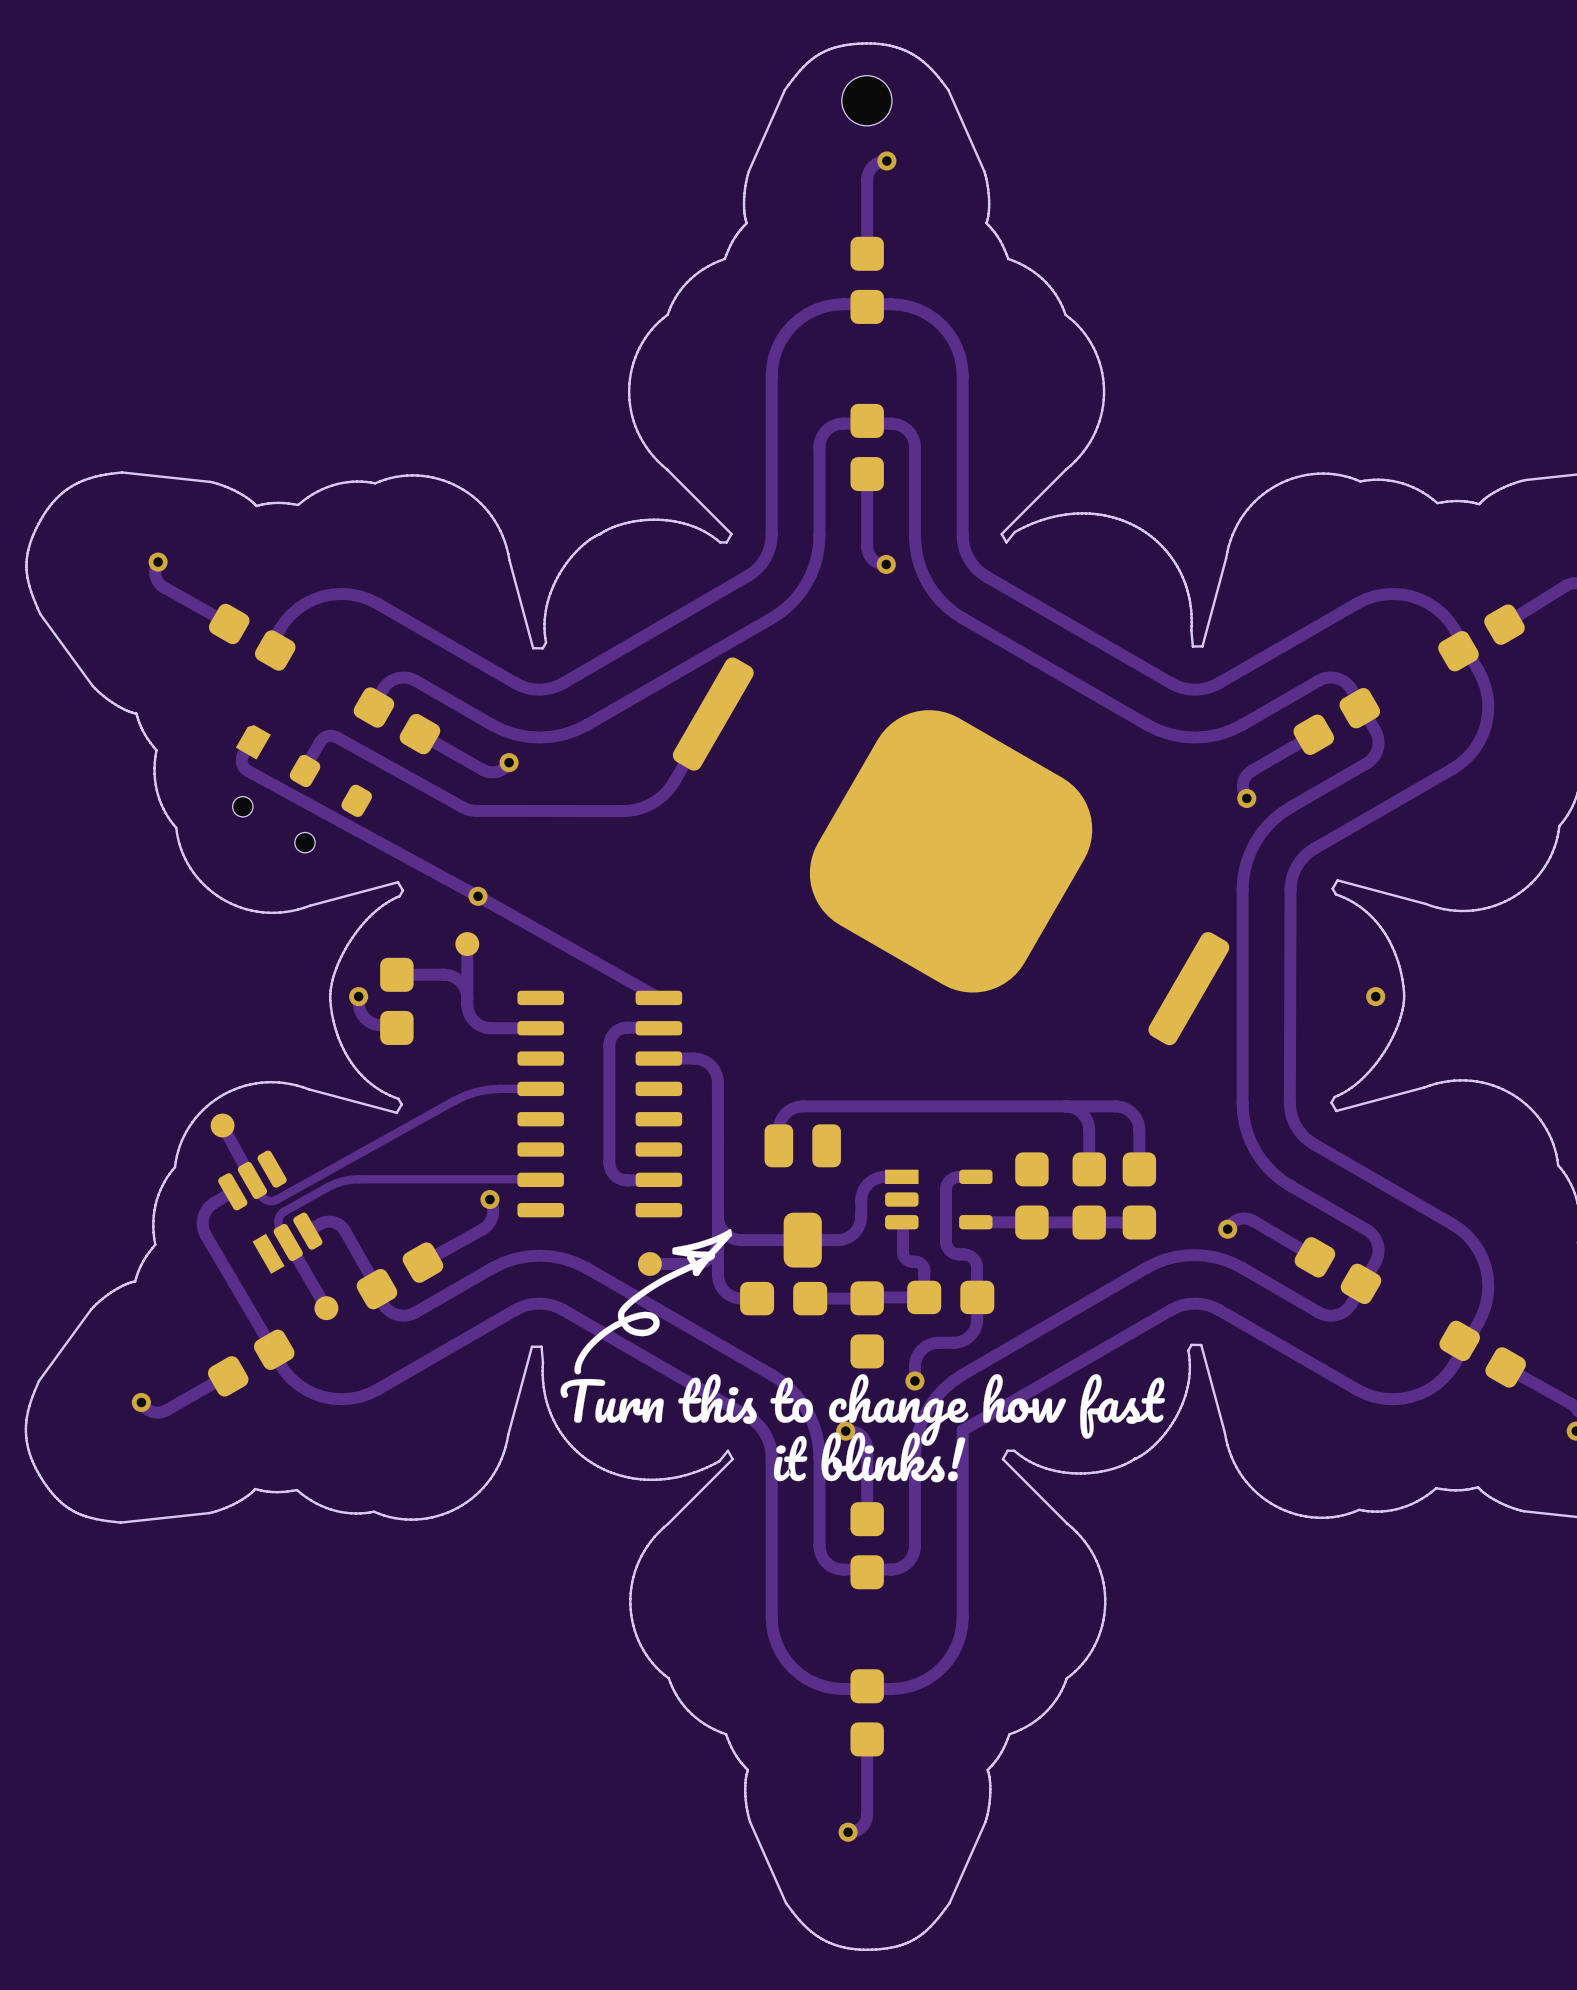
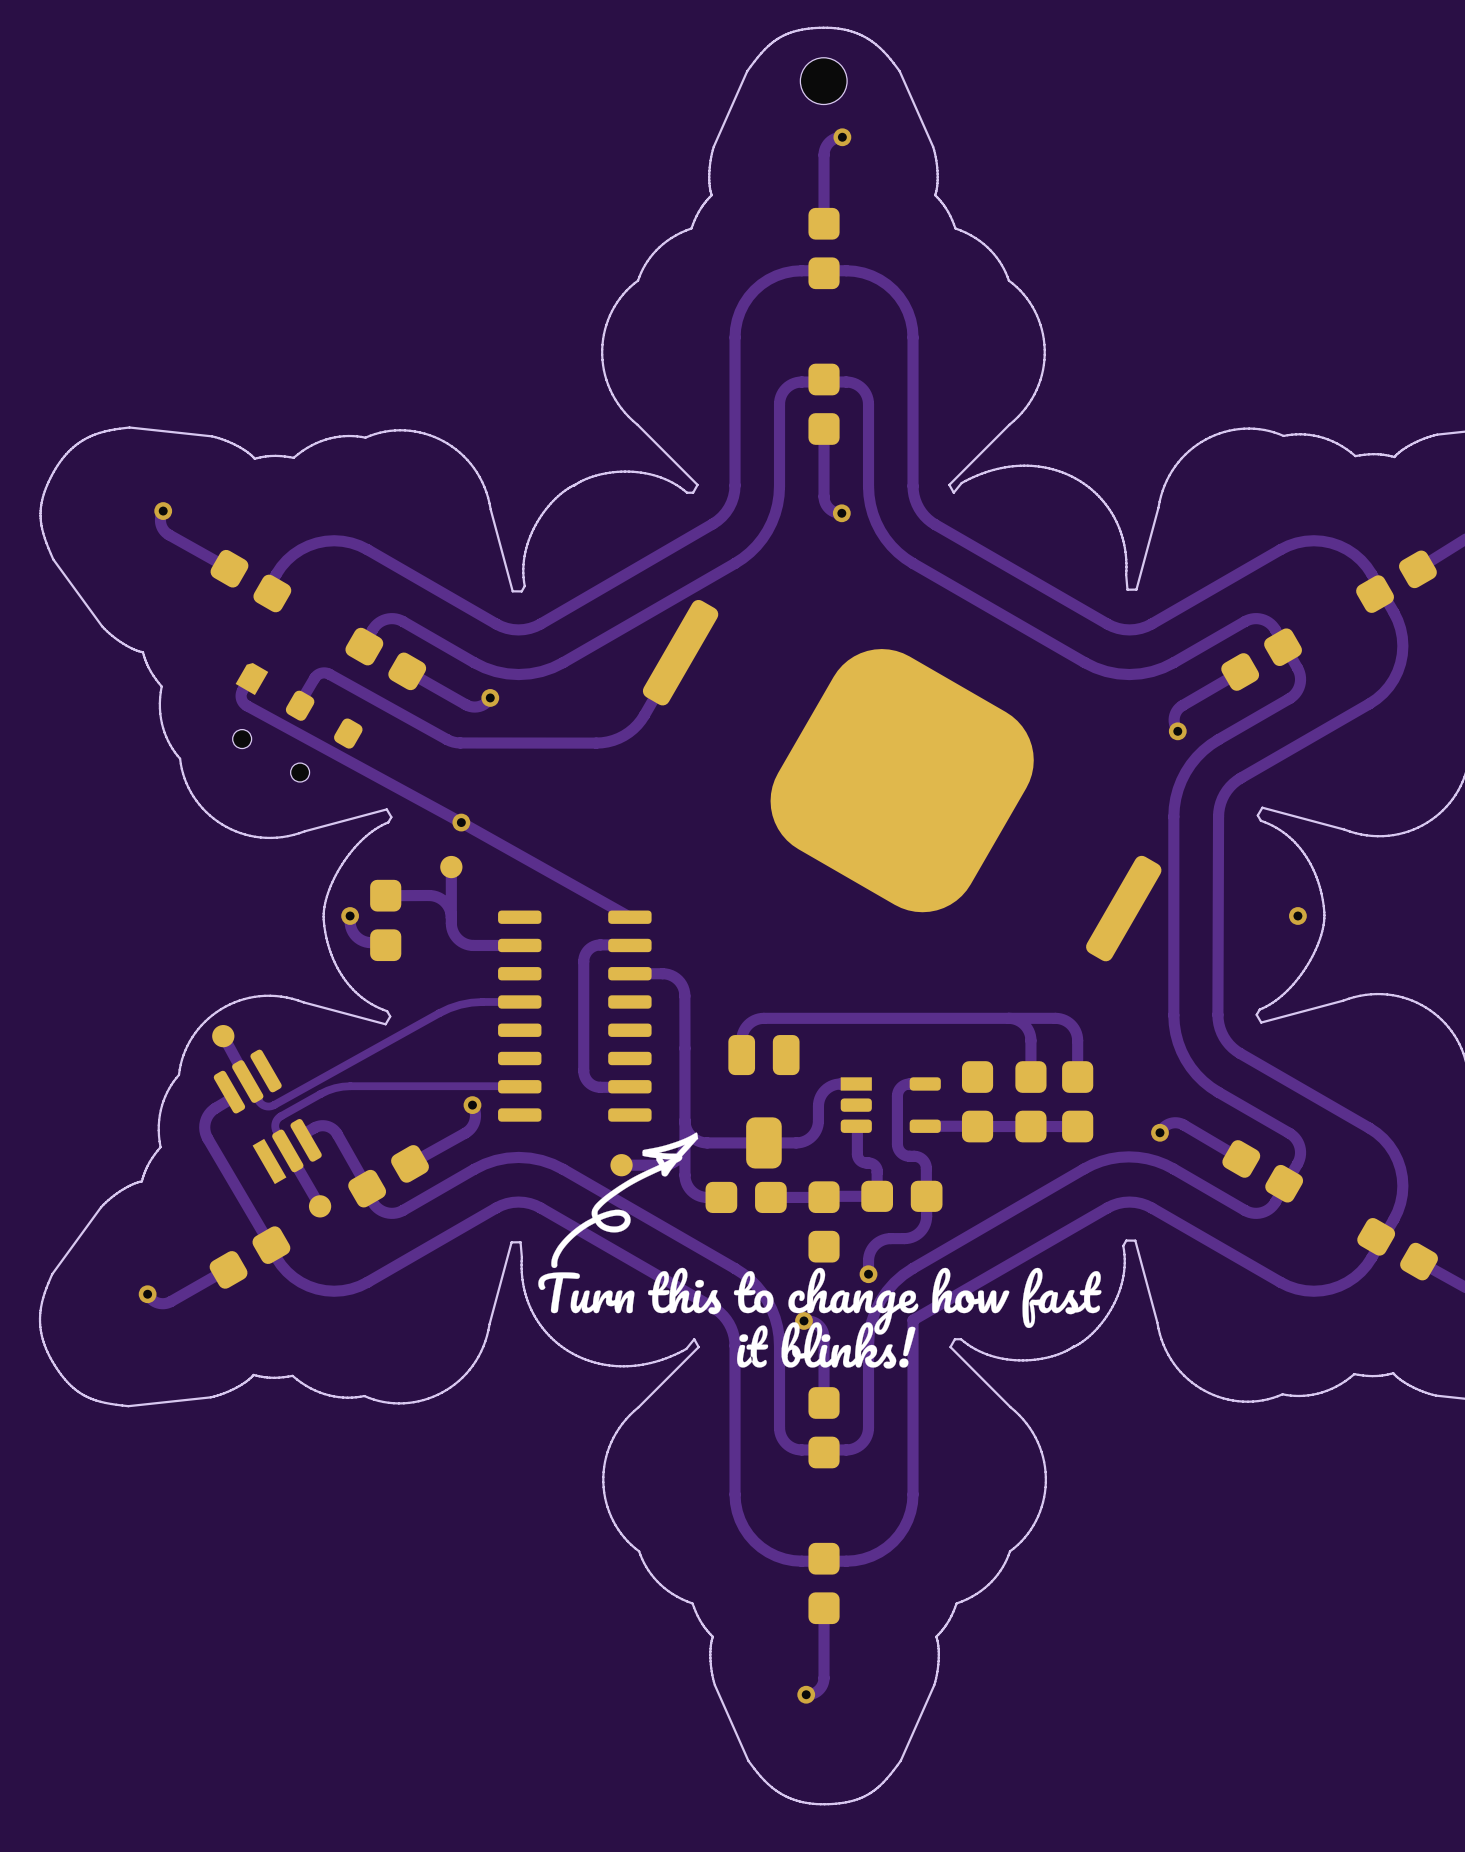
part footprint: [218, 1150, 323, 1274] -> [213, 1049, 322, 1185]

